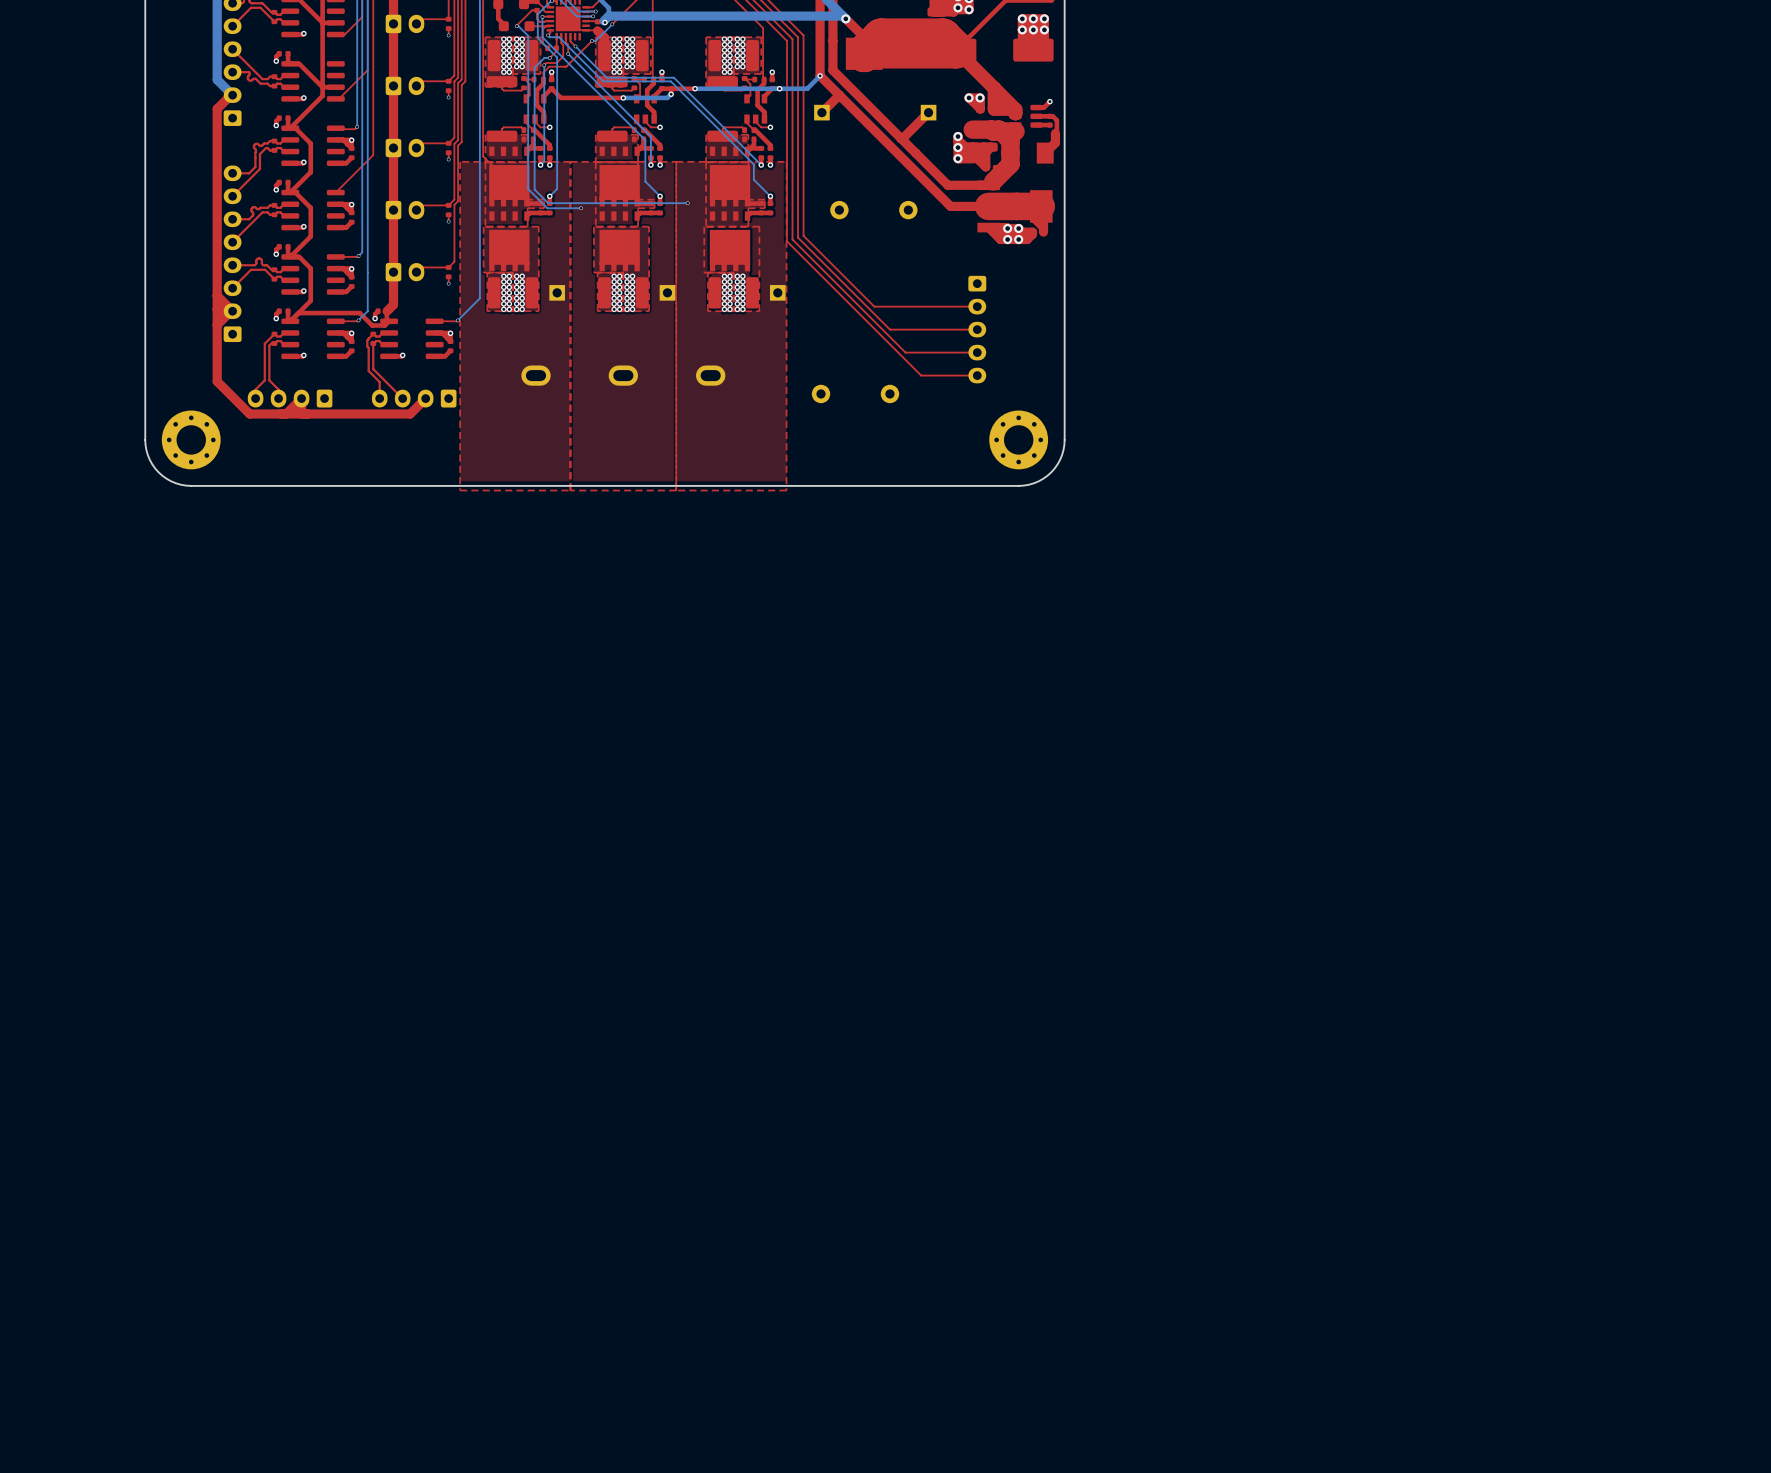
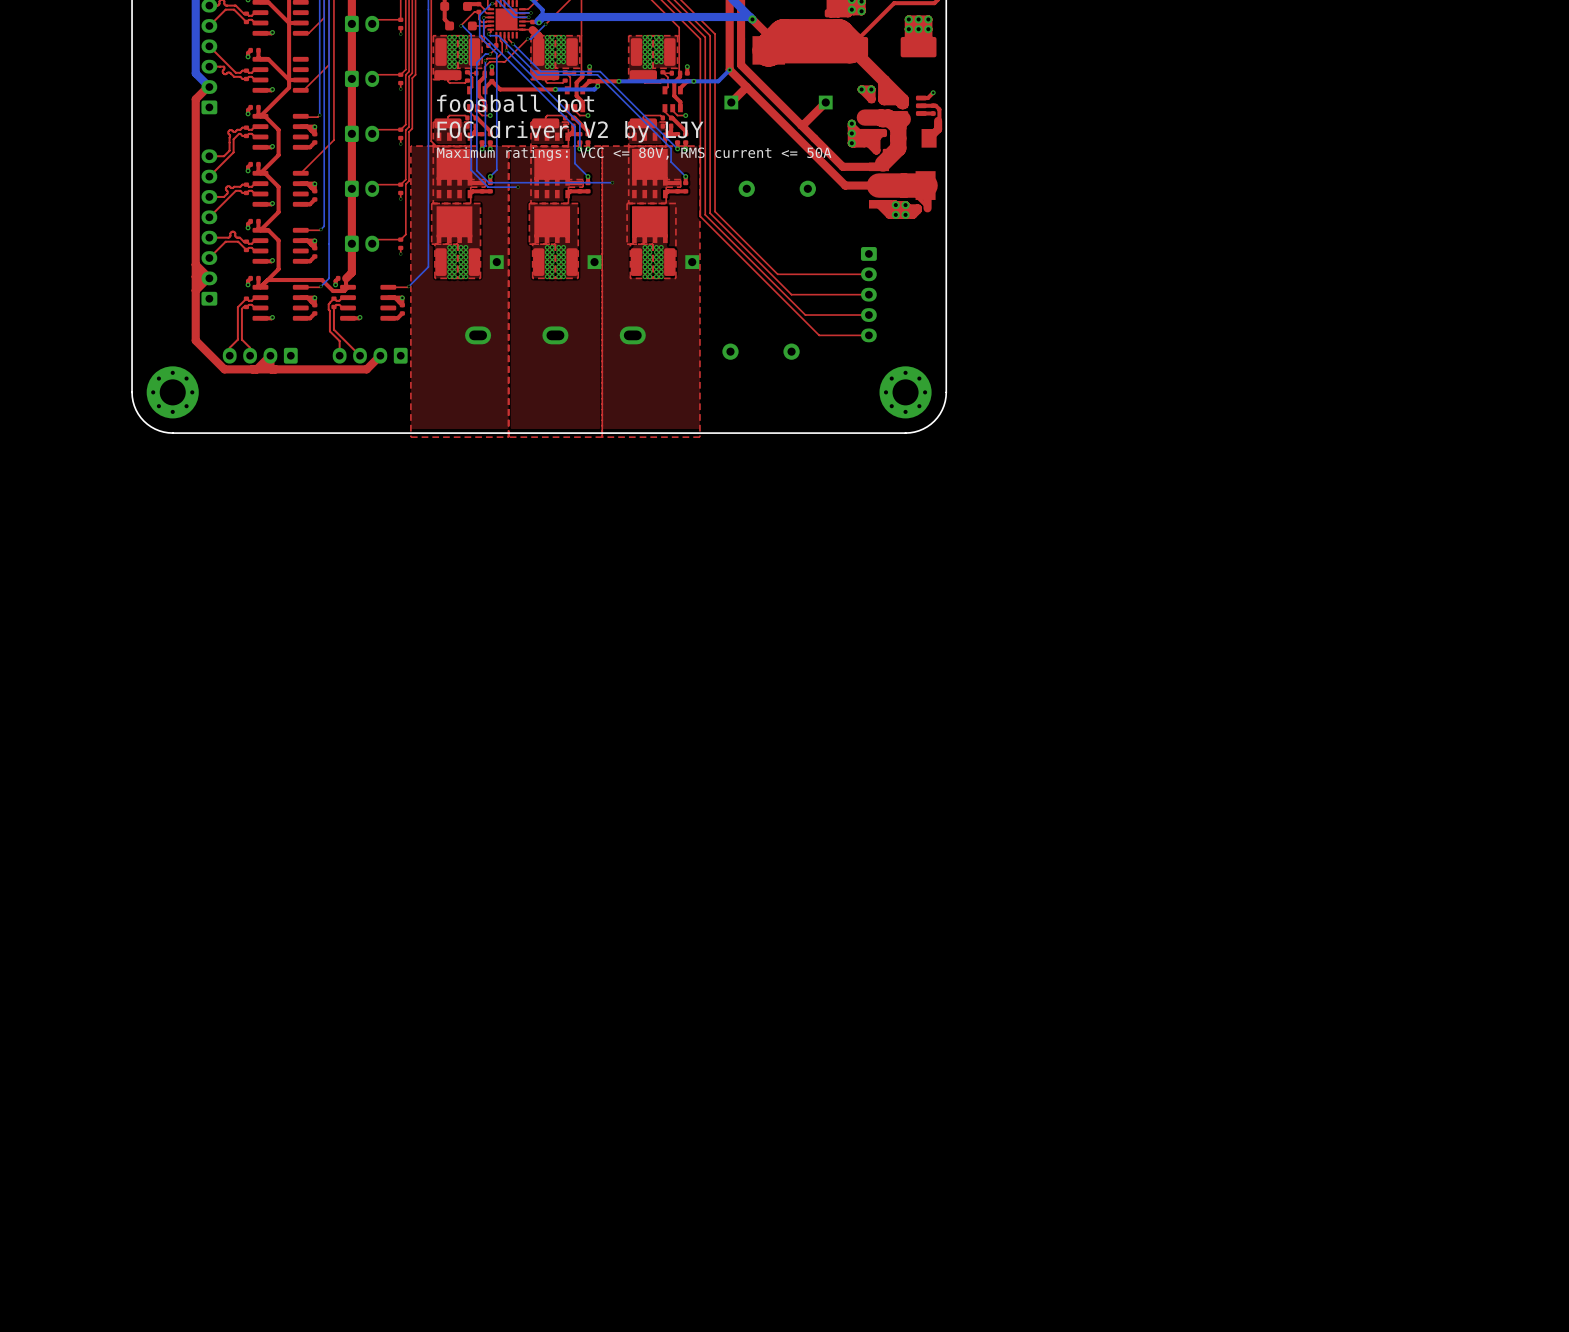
text: none -> foosball bot (515, 103)
text: none -> FOC driver V2 by LJY (570, 131)
text: none -> Maximum ratings: VCC <= 80V, RMS current <= 50A (634, 154)

